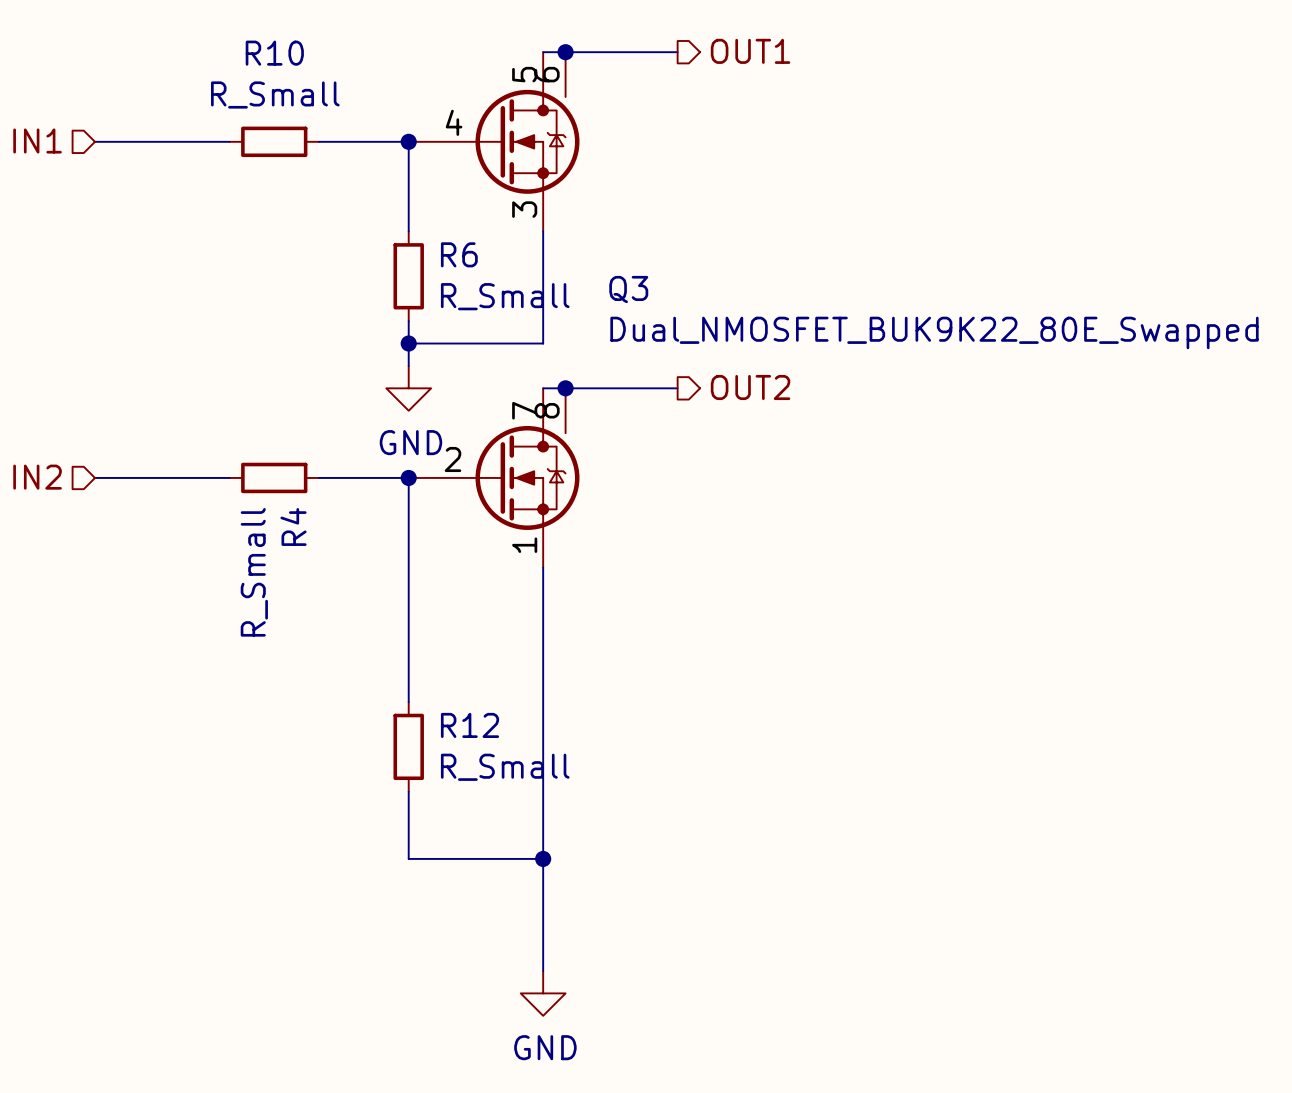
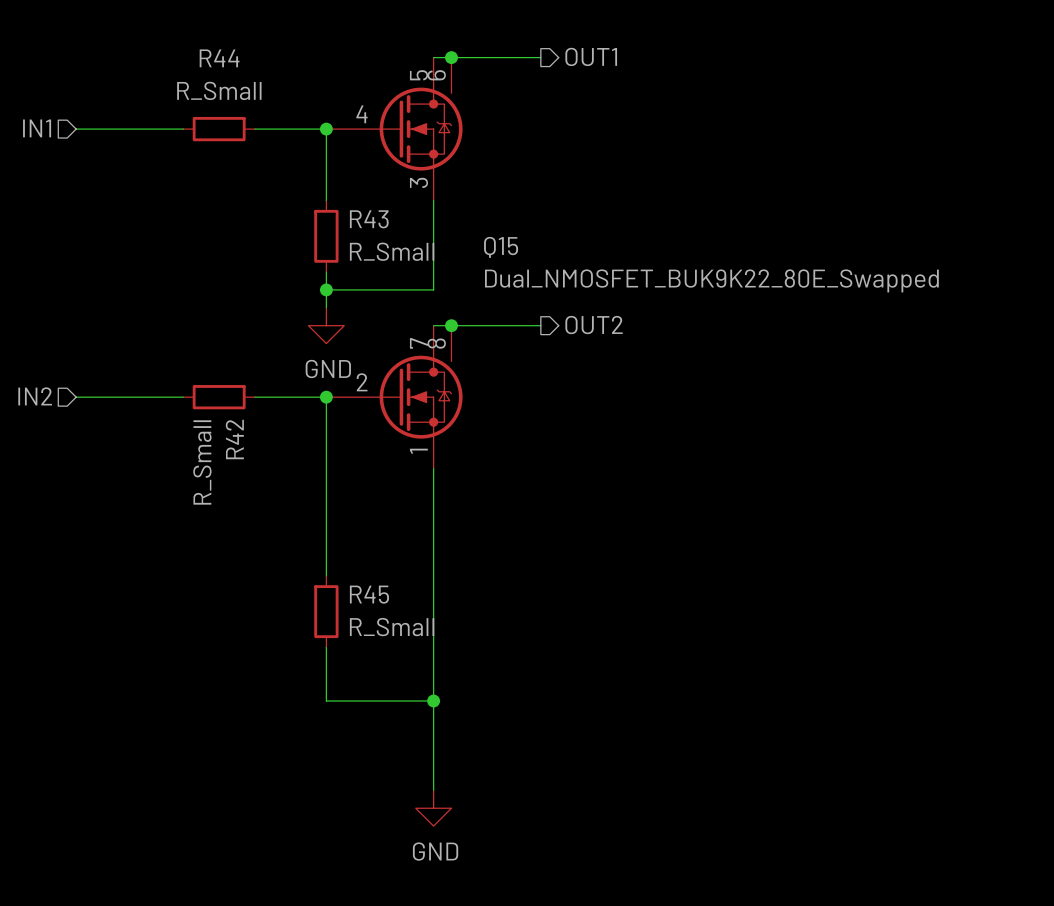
R10 name: R10 (274, 53) -> R44 (219, 58)
R6 name: R6 (459, 254) -> R43 (369, 219)
Q3 name: Q3 (628, 289) -> Q15 (501, 247)
R4 name: R4 (293, 526) -> R42 (234, 439)
R12 name: R12 (470, 725) -> R45 (369, 594)

